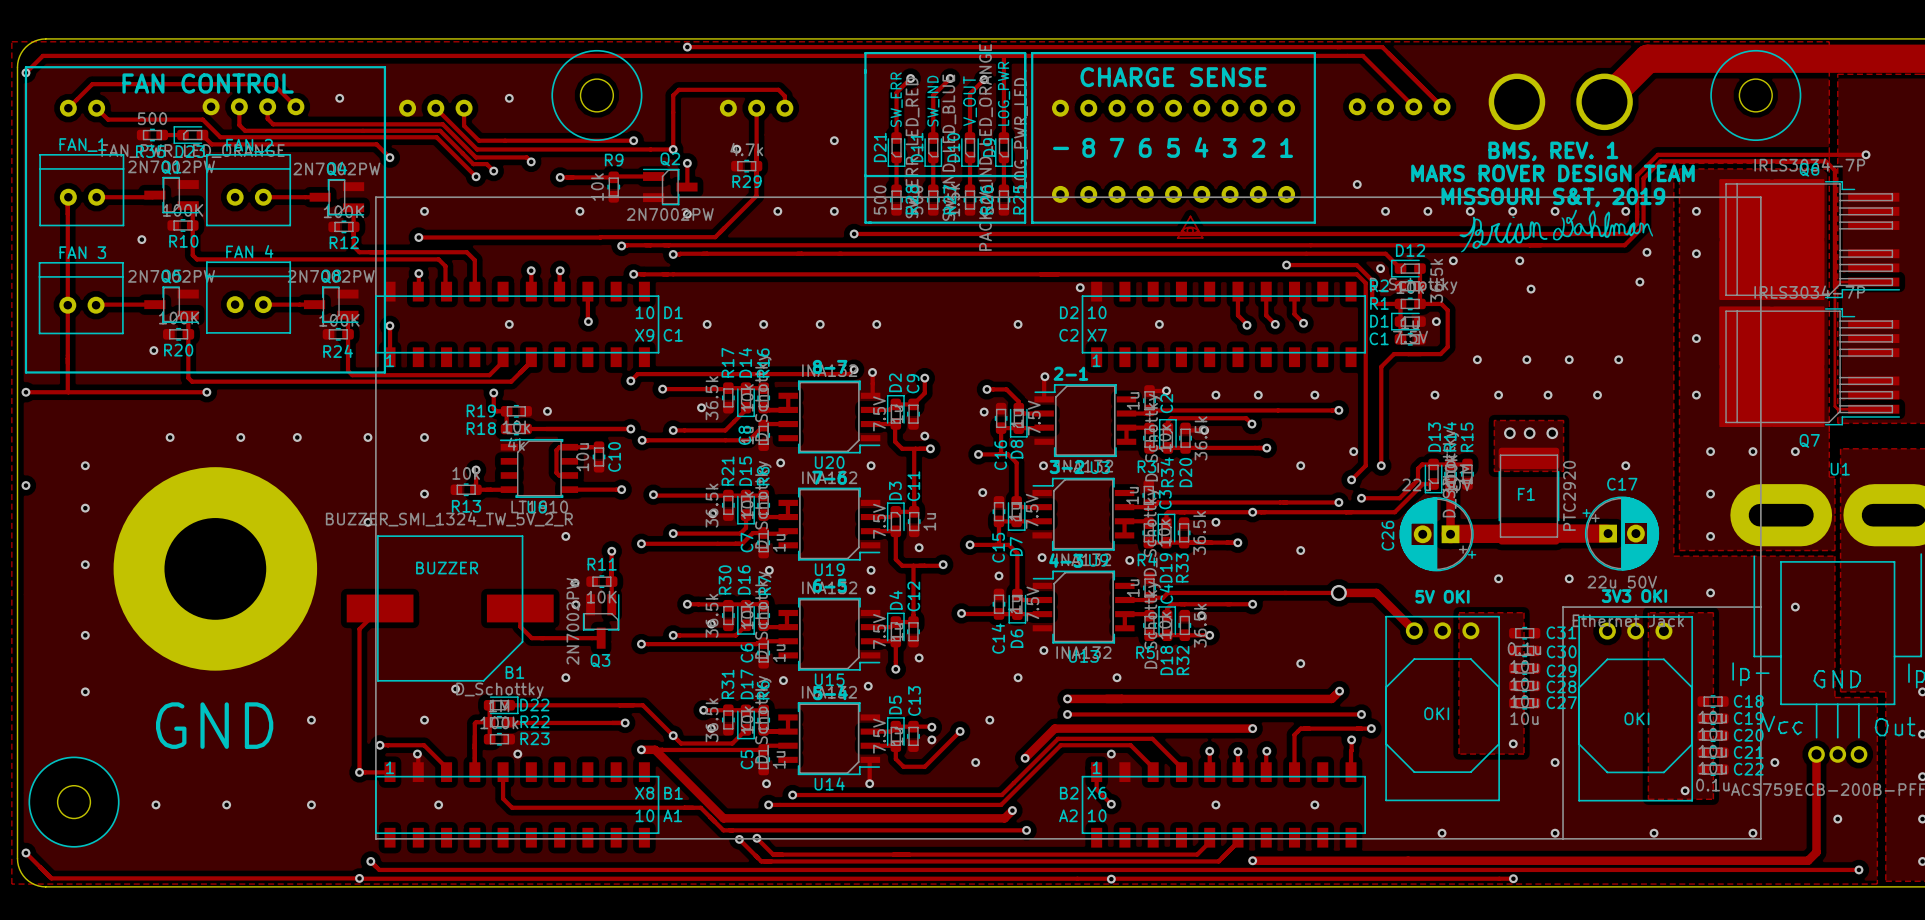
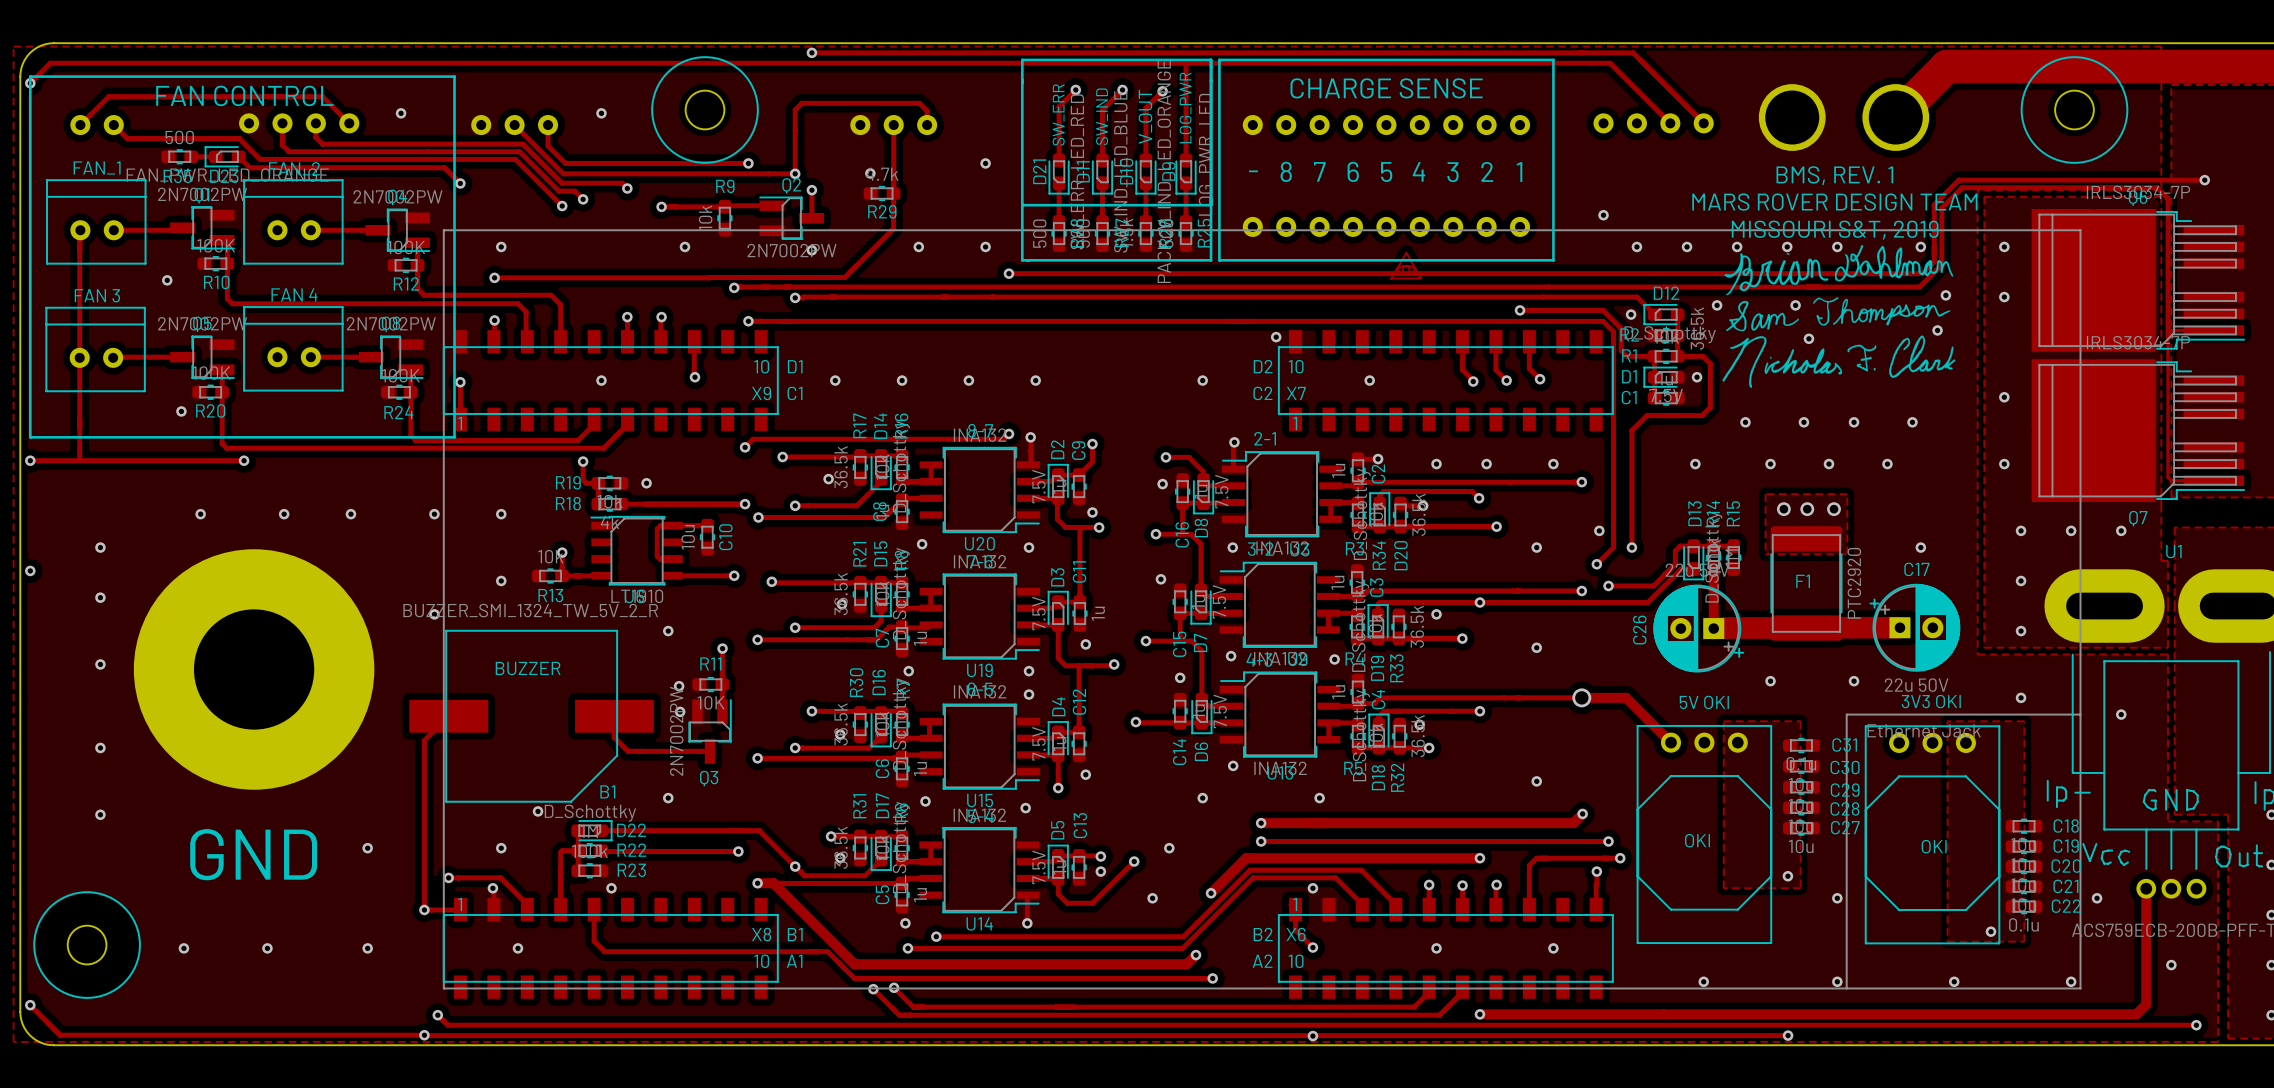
drawing: none -> [1722, 297, 1956, 388]

